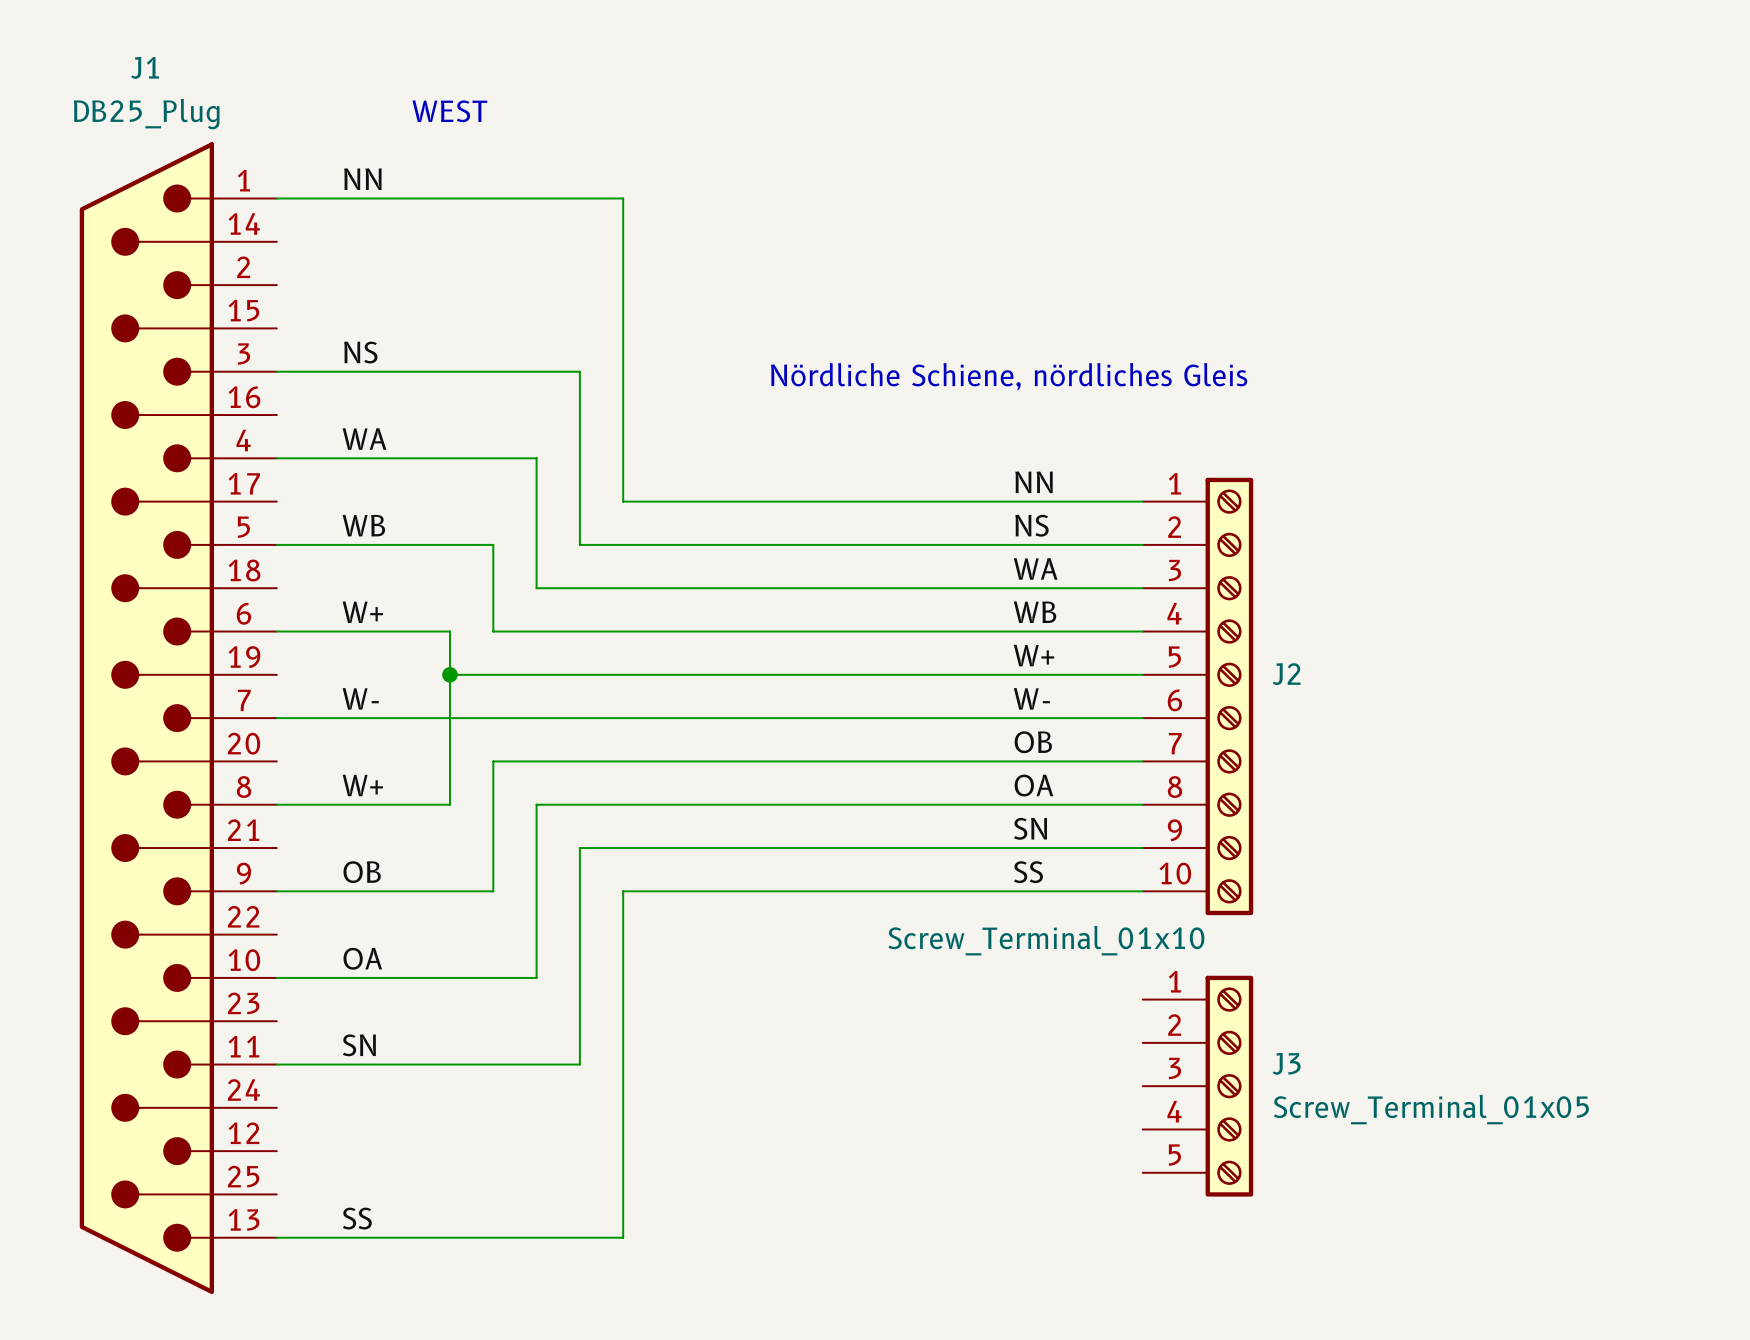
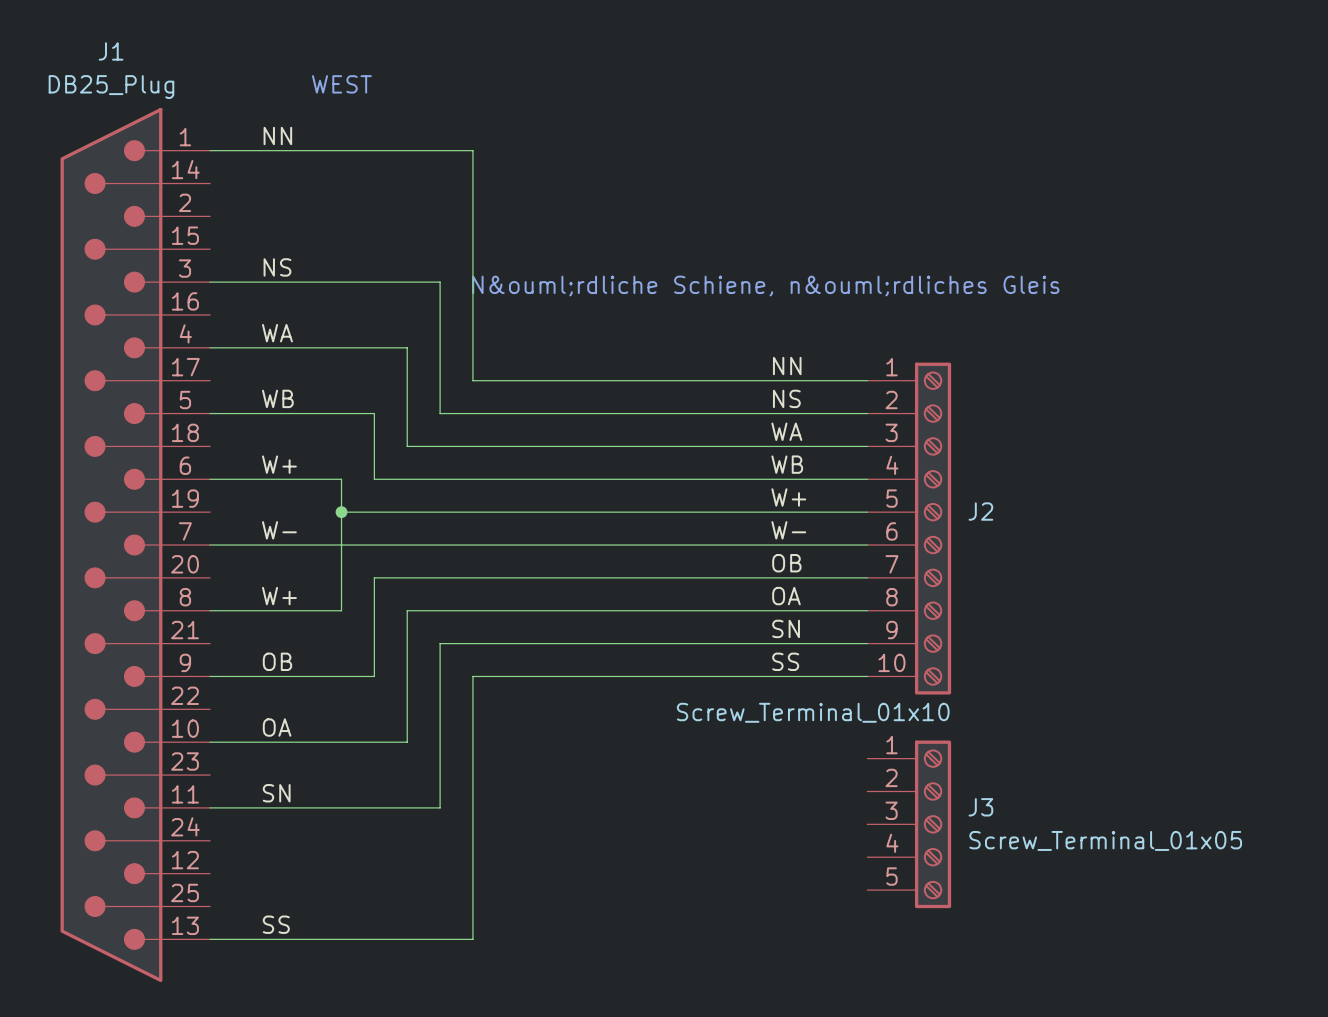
text: Nördliche Schiene, nördliches Gleis (1009, 376) -> N&ouml;rdliche Schiene, n&ouml;rdliches Gleis (765, 286)

